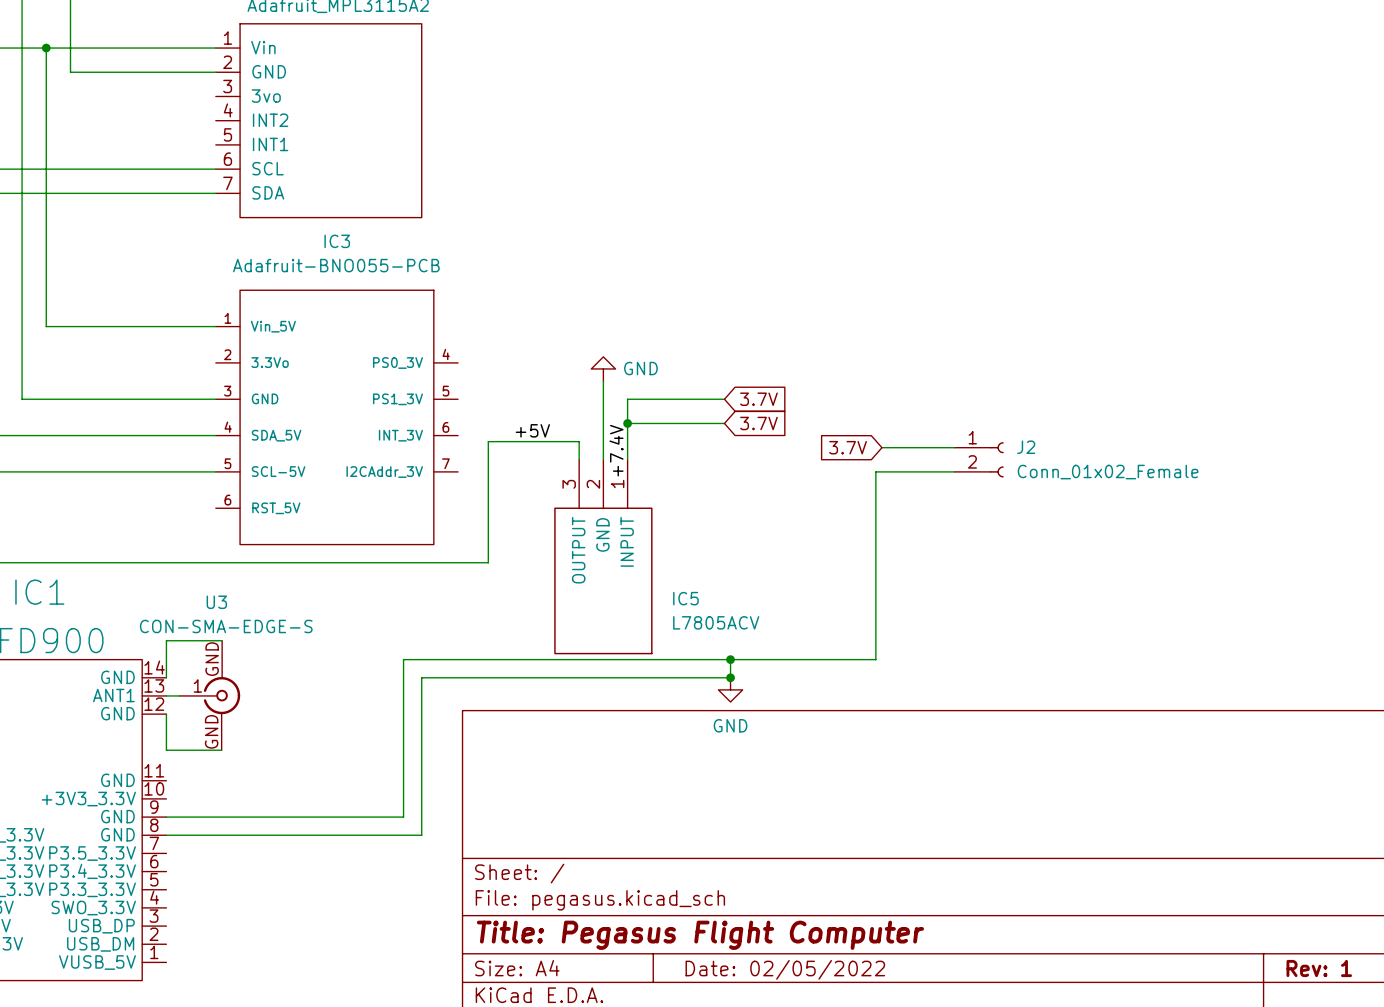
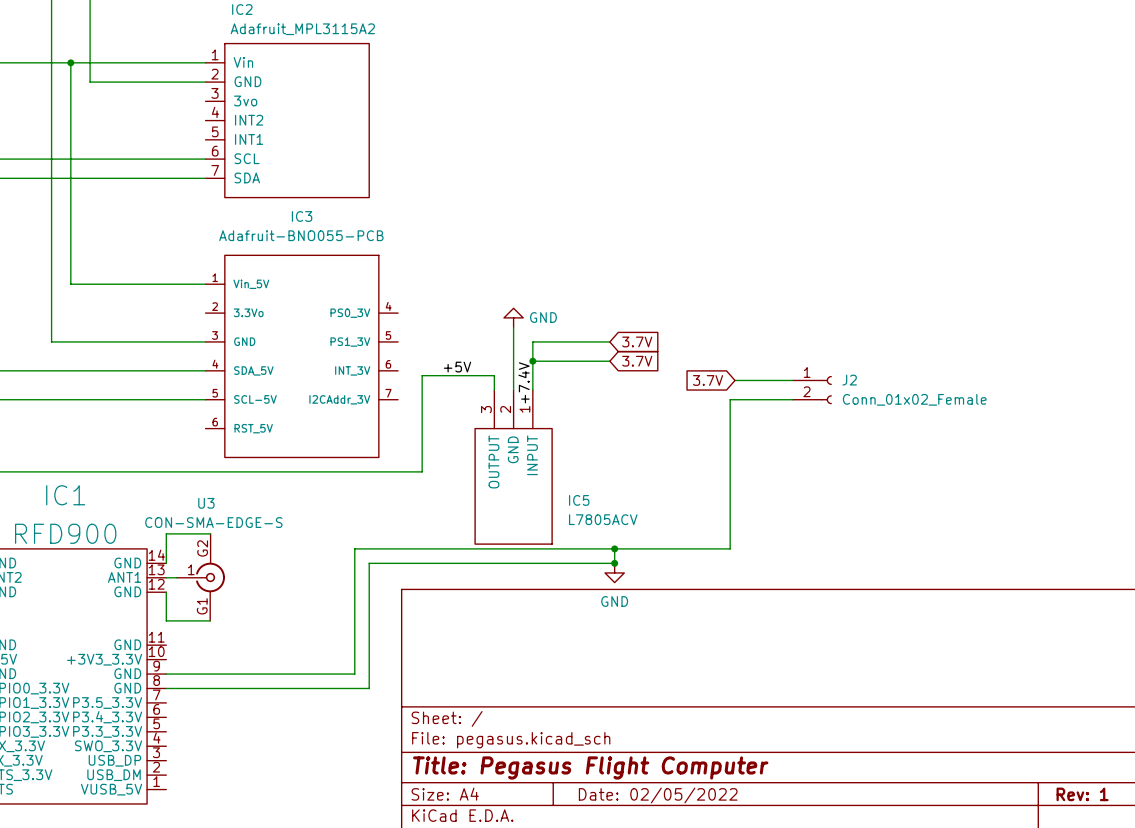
U3 pin number: GND (212, 659) -> G2 (202, 548)
U3 pin number: GND (211, 731) -> G1 (202, 606)

